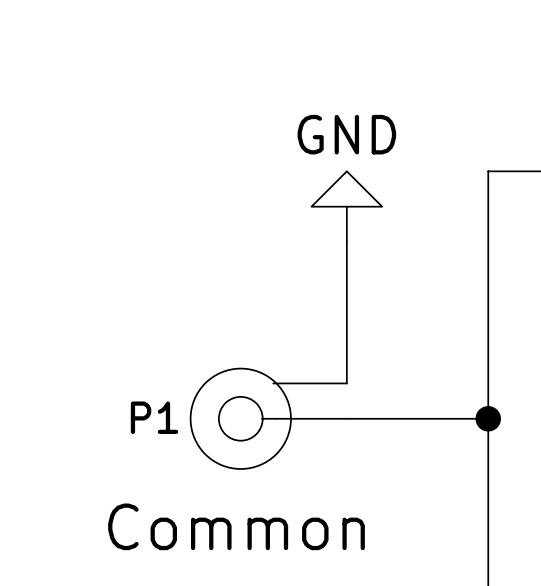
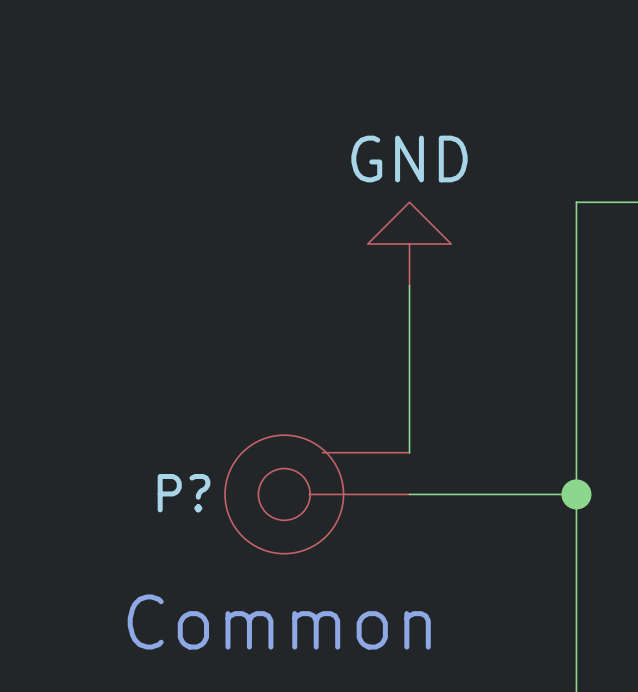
P1 name: P1 (154, 417) -> P? (184, 493)

